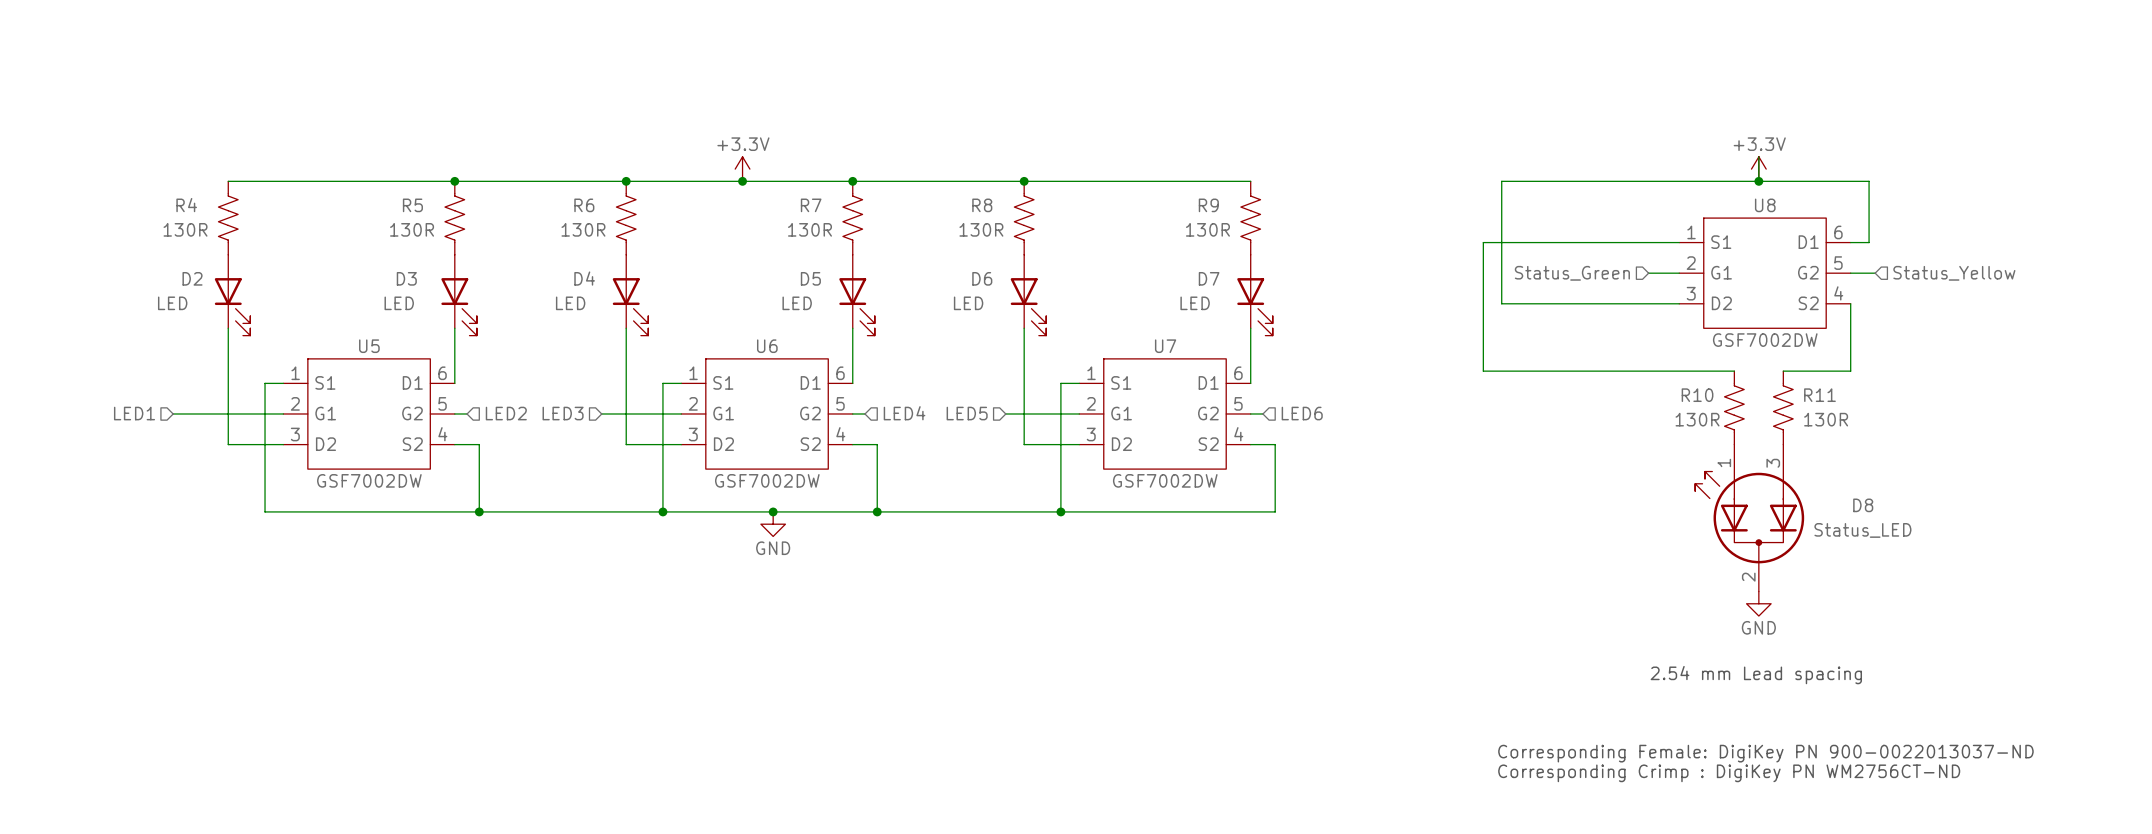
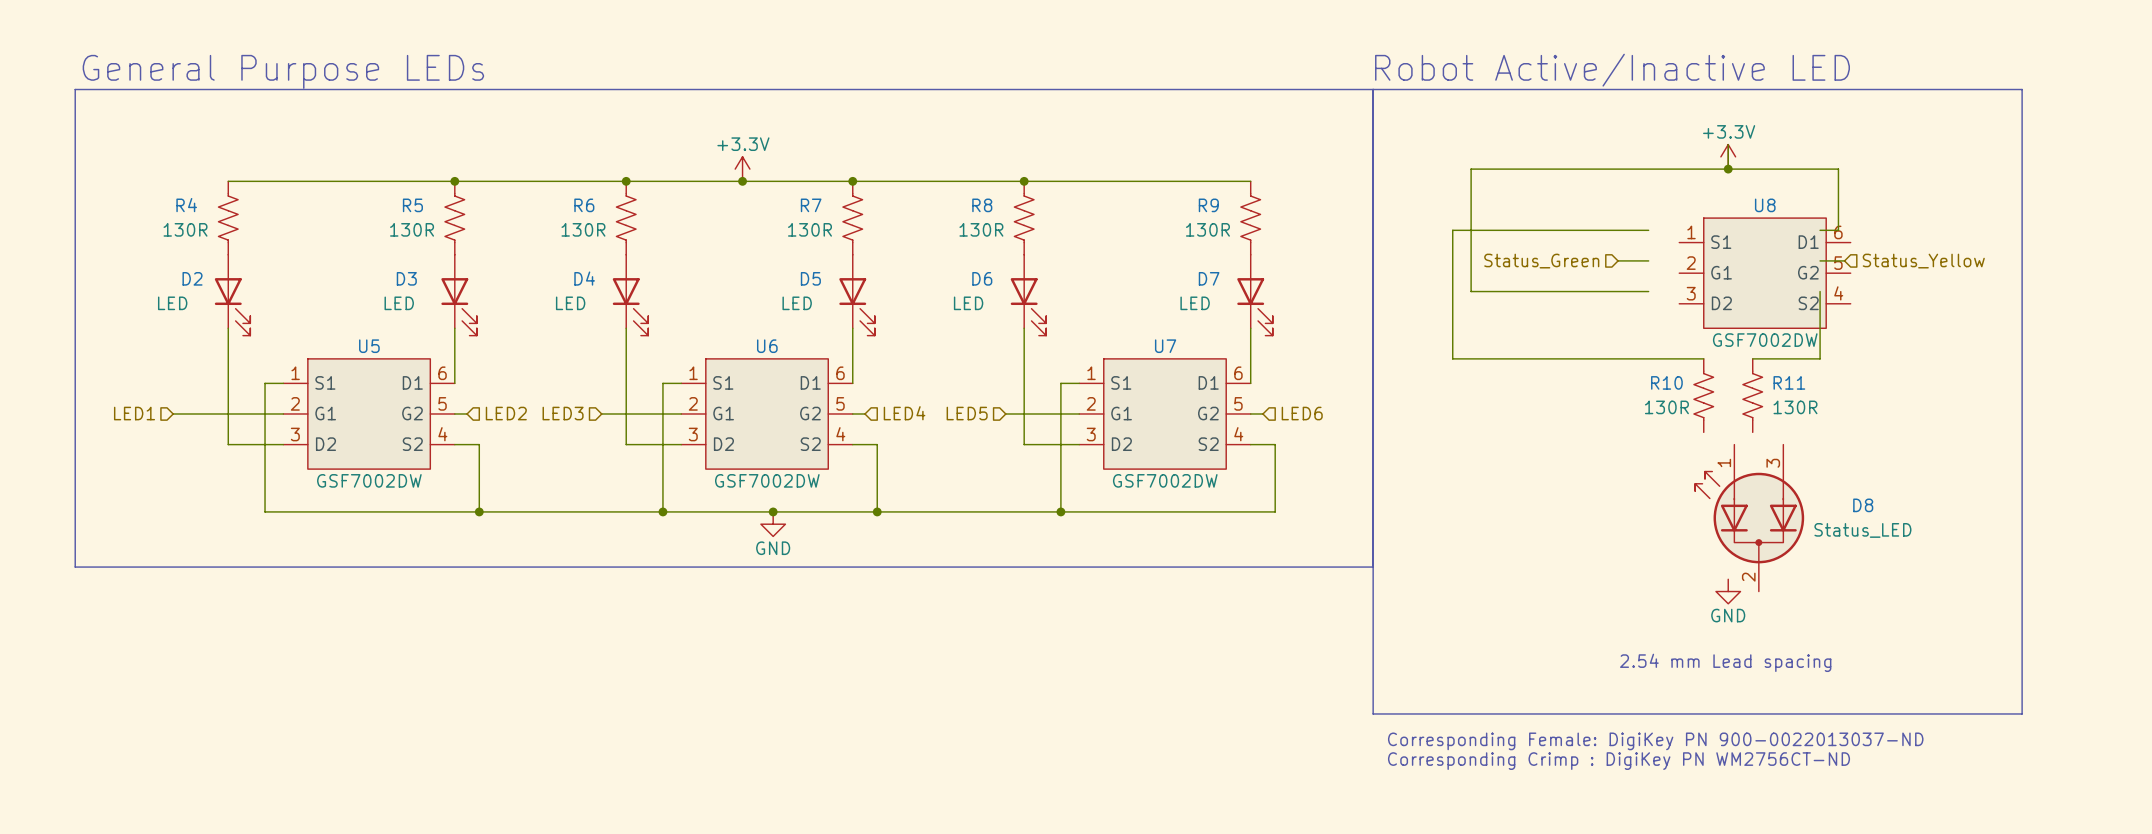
text: none -> Robot Active/Inactive LED (1612, 70)
text: none -> General Purpose LEDs (283, 71)
line: none -> (1373, 89) (1373, 713) (2022, 713) (2022, 89) (75, 89) (75, 567) (1373, 567)
wire: (1758, 156) (1758, 181) -> (1728, 144) (1728, 169)
power symbol position: +3.3V (1758, 169) -> +3.3V (1728, 156)
junction position: (1758, 181) -> (1728, 169)
wire: (1679, 242) (1483, 242) (1483, 371) (1734, 371) -> (1648, 230) (1452, 230) (1452, 358) (1703, 358)
wire: (1850, 242) (1869, 242) (1869, 181) (1501, 181) (1501, 303) (1679, 303) -> (1820, 230) (1838, 230) (1838, 169) (1471, 169) (1471, 291) (1648, 291)
hierarchical label position: Status_Green (1572, 273) -> Status_Green (1541, 261)
wire: (1648, 273) (1679, 273) -> (1618, 260) (1648, 260)
wire: (1850, 273) (1875, 273) -> (1820, 260) (1844, 260)
hierarchical label position: Status_Yellow (1954, 273) -> Status_Yellow (1923, 261)
wire: (1850, 303) (1850, 371) (1783, 371) -> (1820, 291) (1820, 358) (1752, 358)
R10 position: (1734, 407) -> (1703, 395)
R11 position: (1783, 407) -> (1752, 395)
power symbol position: GND (1758, 603) -> GND (1728, 591)
text position: 2.54 mm Lead spacing (1756, 675) -> 2.54 mm Lead spacing (1725, 662)
text position: Corresponding Female: DigiKey PN 900-0022013037-ND (1765, 753) -> Corresponding Female: DigiKey PN 900-0022013037-ND (1655, 741)
text position: Corresponding Crimp : DigiKey PN WM2756CT-ND (1729, 773) -> Corresponding Crimp : DigiKey PN WM2756CT-ND (1619, 761)

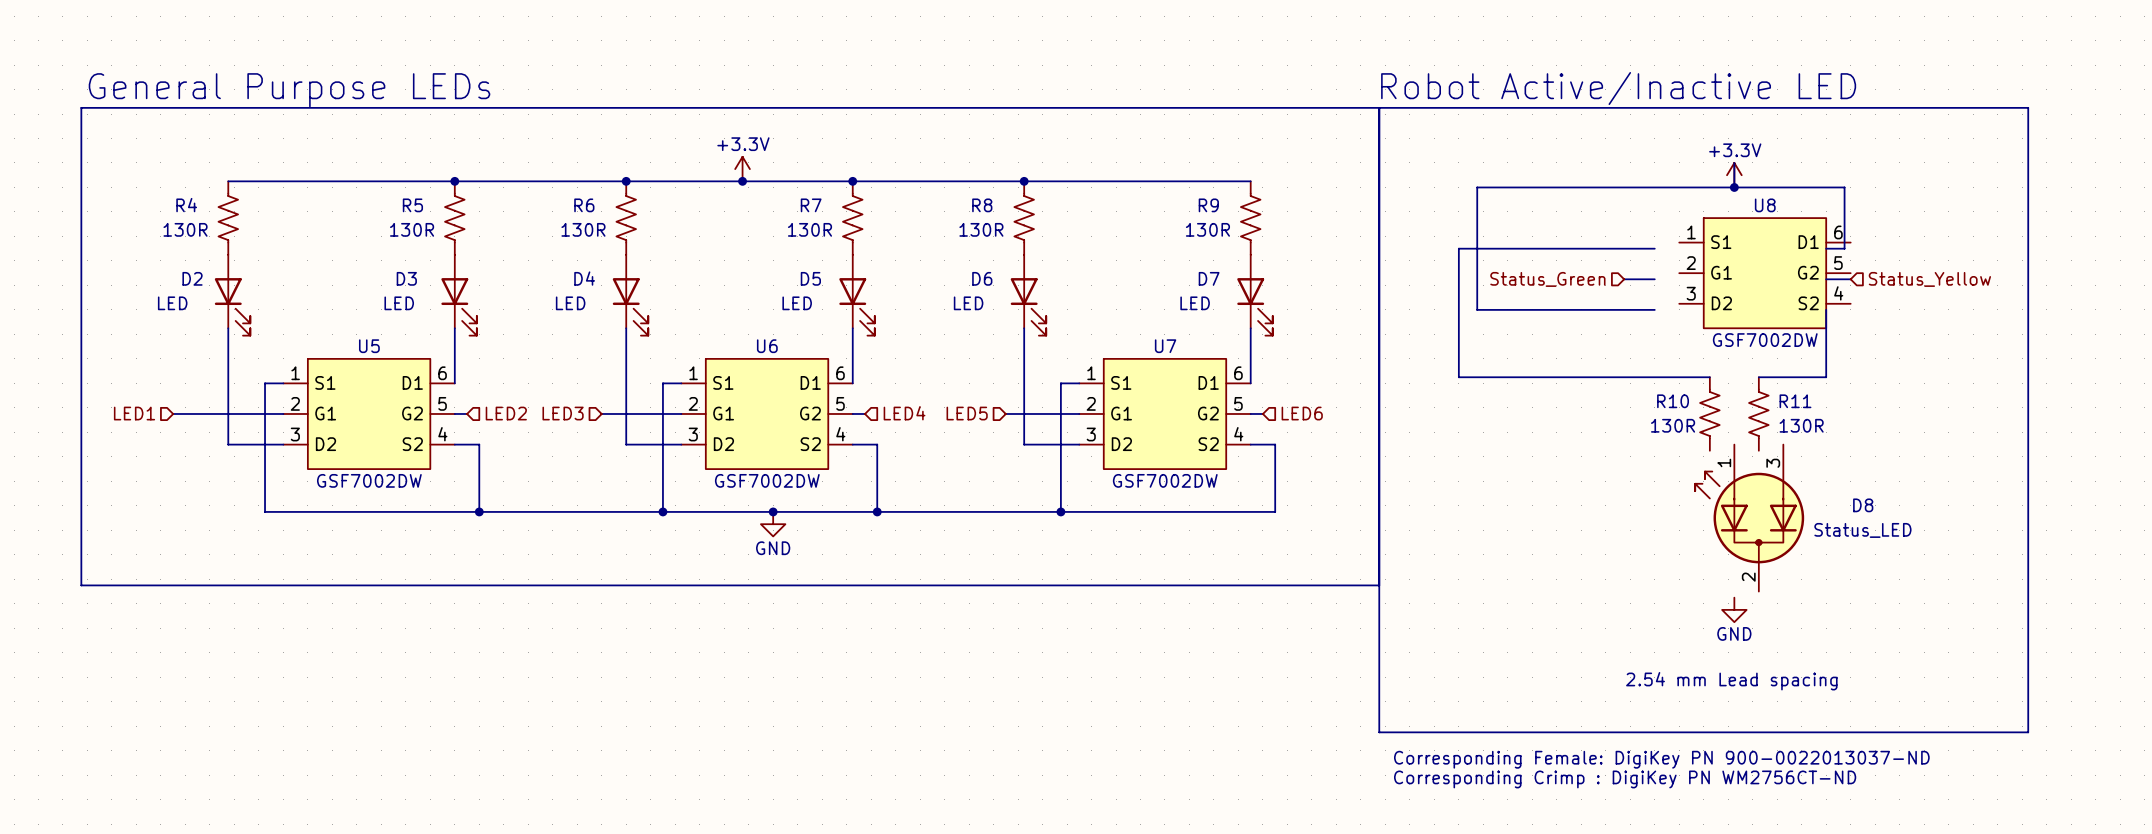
text position: Robot Active/Inactive LED (1612, 70) -> Robot Active/Inactive LED (1618, 88)
text position: General Purpose LEDs (283, 71) -> General Purpose LEDs (289, 90)
line: (1373, 89) (1373, 713) (2022, 713) (2022, 89) (75, 89) (75, 567) (1373, 567) -> (1379, 107) (1379, 732) (2028, 732) (2028, 107) (81, 107) (81, 585) (1379, 585)
wire: (1728, 144) (1728, 169) -> (1734, 162) (1734, 187)
power symbol position: +3.3V (1728, 156) -> +3.3V (1734, 175)
junction position: (1728, 169) -> (1734, 187)
wire: (1648, 230) (1452, 230) (1452, 358) (1703, 358) -> (1654, 248) (1458, 248) (1458, 377) (1709, 377)
wire: (1820, 230) (1838, 230) (1838, 169) (1471, 169) (1471, 291) (1648, 291) -> (1826, 248) (1844, 248) (1844, 187) (1477, 187) (1477, 309) (1654, 309)
wire: (1618, 260) (1648, 260) -> (1624, 279) (1654, 279)
wire: (1820, 260) (1844, 260) -> (1826, 279) (1850, 279)
hierarchical label position: Status_Green (1541, 261) -> Status_Green (1547, 279)
hierarchical label position: Status_Yellow (1923, 261) -> Status_Yellow (1929, 279)
wire: (1820, 291) (1820, 358) (1752, 358) -> (1826, 309) (1826, 377) (1758, 377)
R10 position: (1703, 395) -> (1709, 413)
R11 position: (1752, 395) -> (1758, 413)
power symbol position: GND (1728, 591) -> GND (1734, 609)
text position: 2.54 mm Lead spacing (1725, 662) -> 2.54 mm Lead spacing (1731, 681)
text position: Corresponding Female: DigiKey PN 900-0022013037-ND (1655, 741) -> Corresponding Female: DigiKey PN 900-0022013037-ND (1661, 759)
text position: Corresponding Crimp : DigiKey PN WM2756CT-ND (1619, 761) -> Corresponding Crimp : DigiKey PN WM2756CT-ND (1625, 779)

